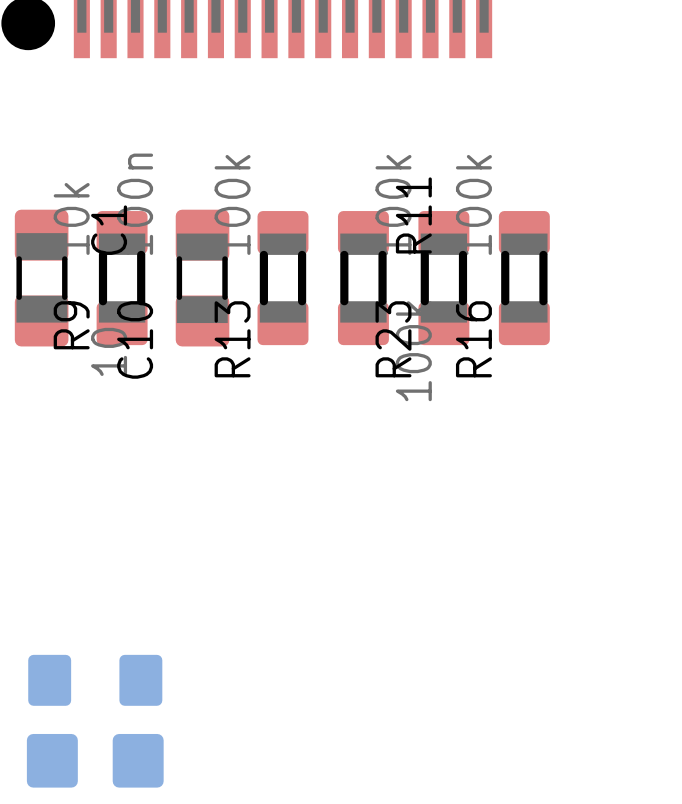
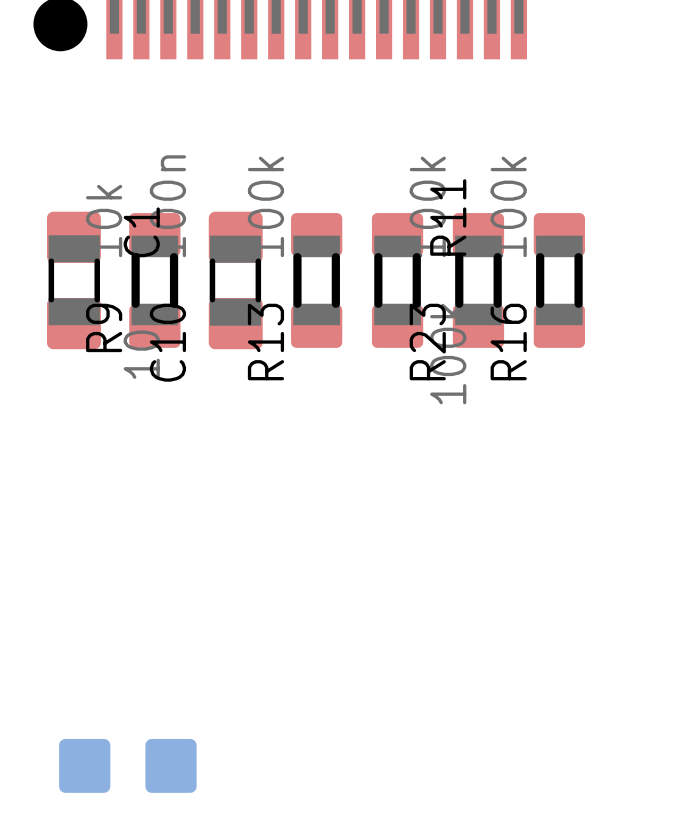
part: (95, 680) -> none

